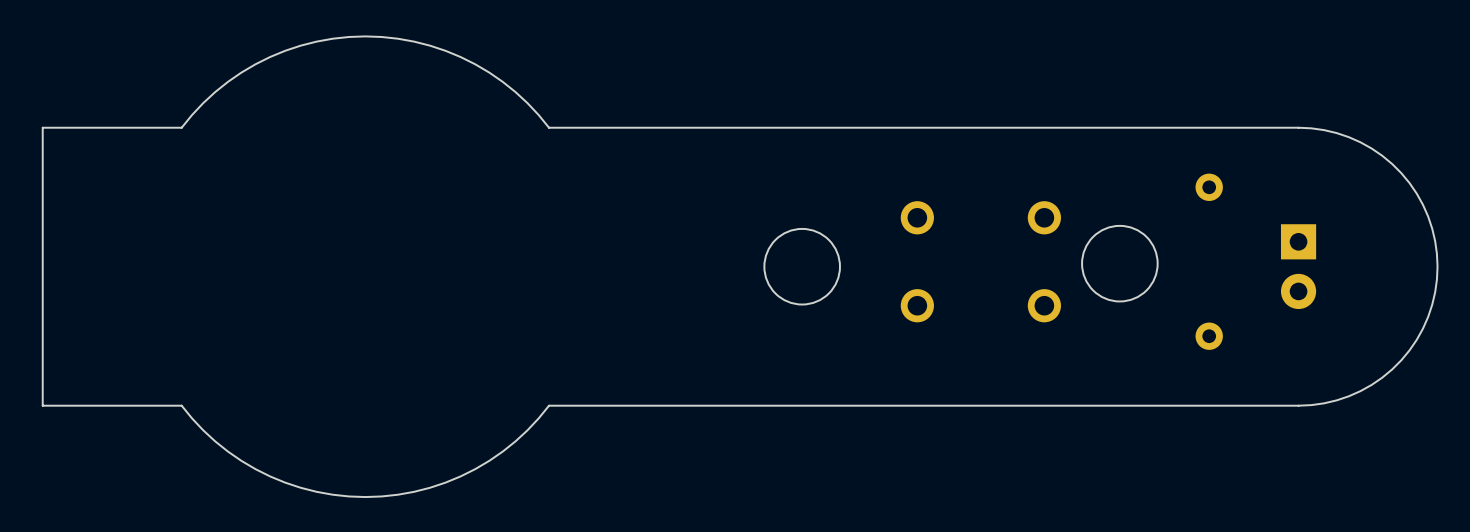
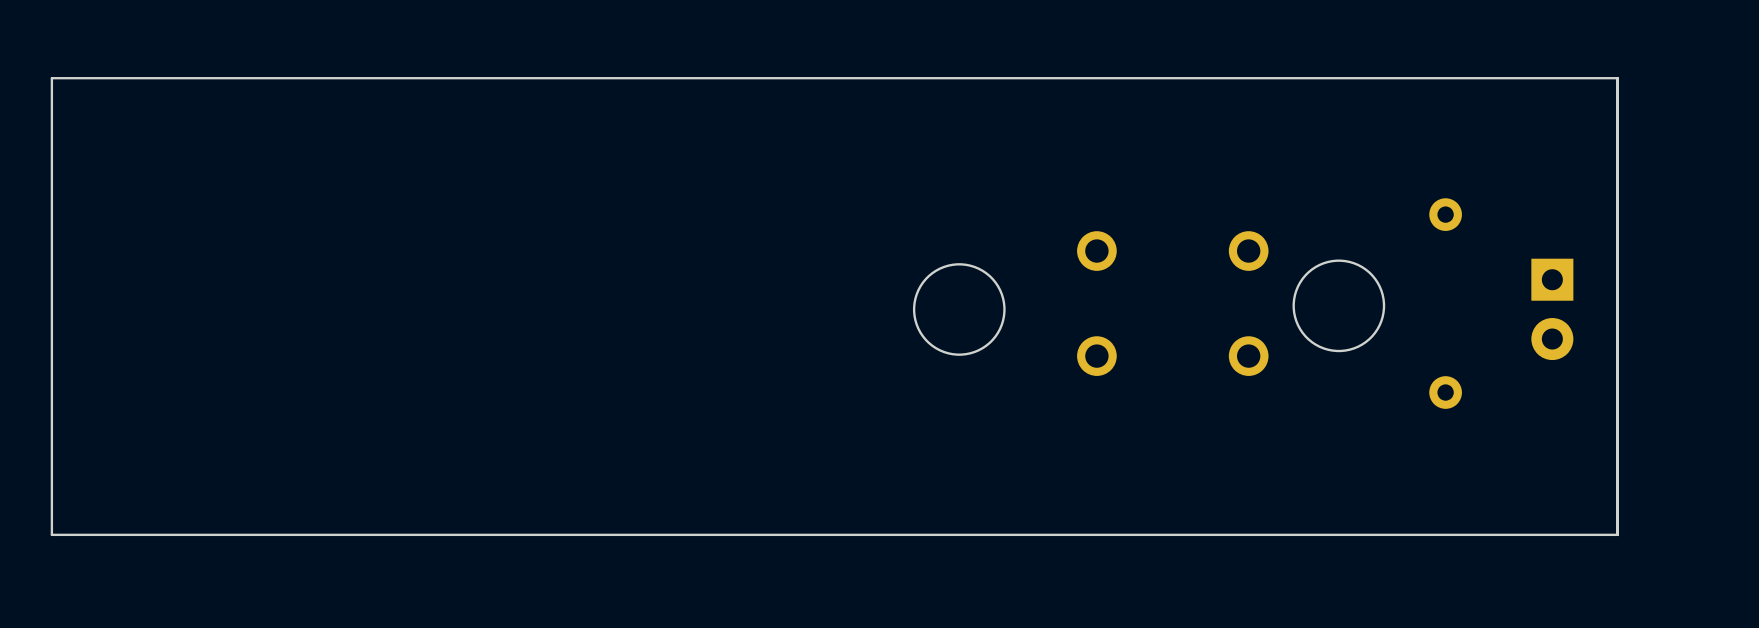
board edge: (42, 127) (181, 127) (215, 92) (241, 72) (270, 56) (316, 41) (365, 36) (414, 41) (445, 50) (475, 64) (515, 92) (549, 127) (1311, 128) (1336, 133) (1360, 142) (1382, 155) (1401, 173) (1416, 193) (1428, 216) (1435, 241) (1437, 266) (1435, 292) (1428, 316) (1416, 339) (1401, 360) (1382, 377) (1360, 391) (1336, 400) (1311, 405) (549, 405) (527, 430) (502, 451) (460, 476) (414, 491) (365, 497) (316, 491) (285, 482) (255, 469) (215, 441) (181, 405) (42, 405) -> (51, 143) (51, 78) (1617, 78) (1617, 534) (51, 534) (51, 475)

